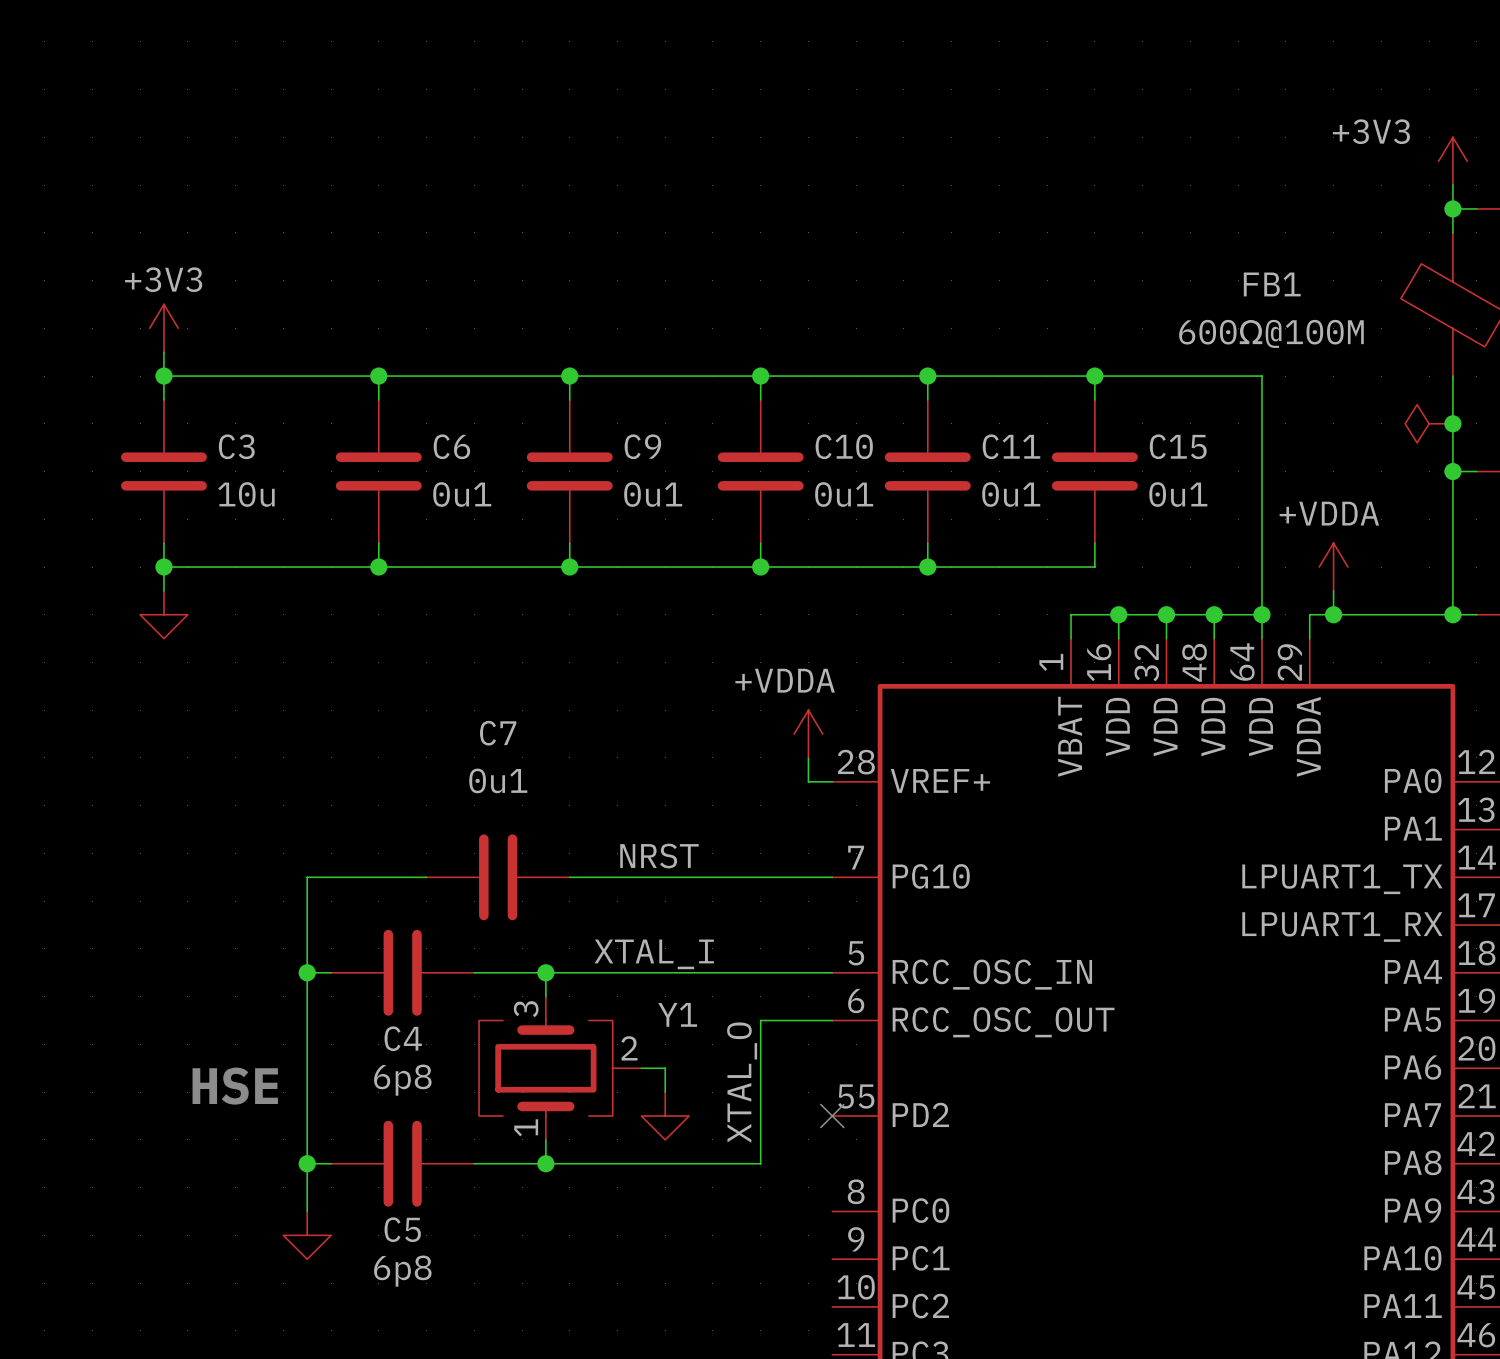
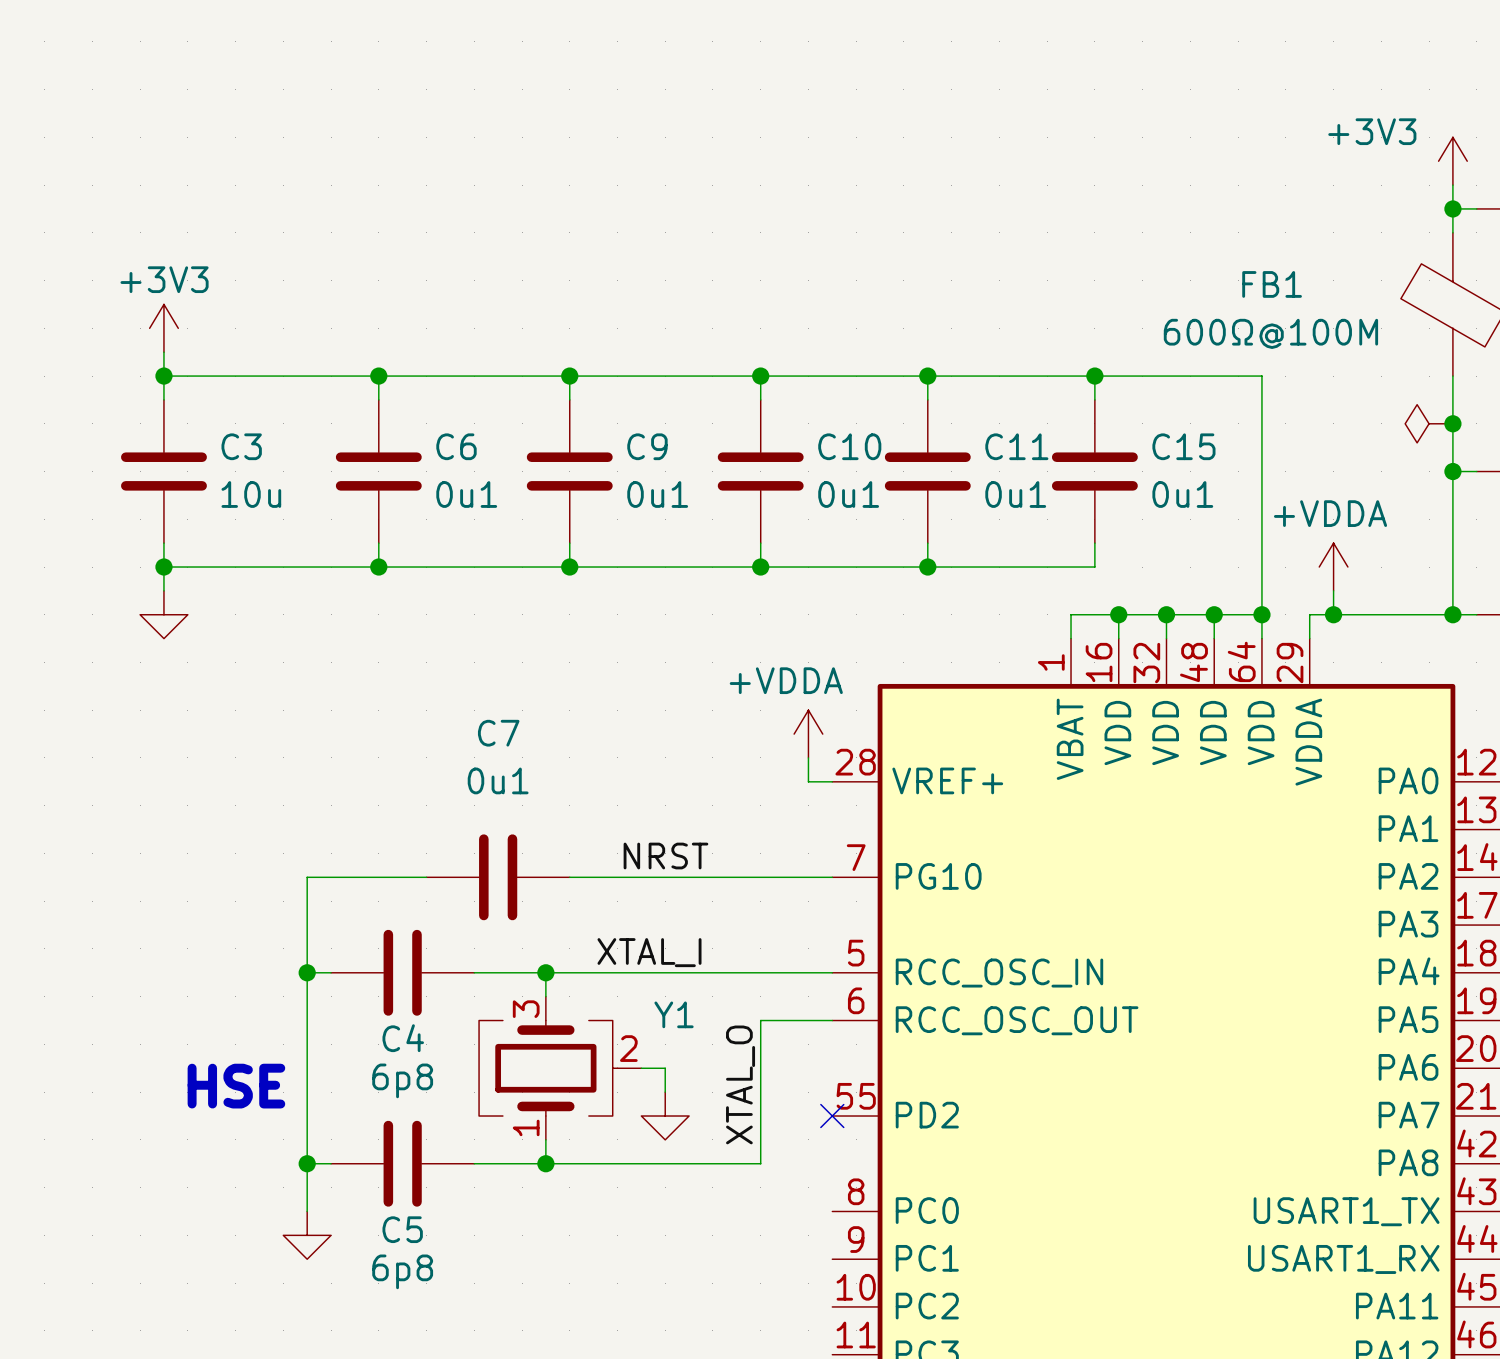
part pin name: LPUART1_TX (1342, 879) -> PA2 (1408, 876)
part pin name: LPUART1_RX (1342, 927) -> PA3 (1408, 924)
part pin name: PA9 (1413, 1210) -> USART1_TX (1346, 1211)
part pin name: PA10 (1402, 1258) -> USART1_RX (1343, 1259)

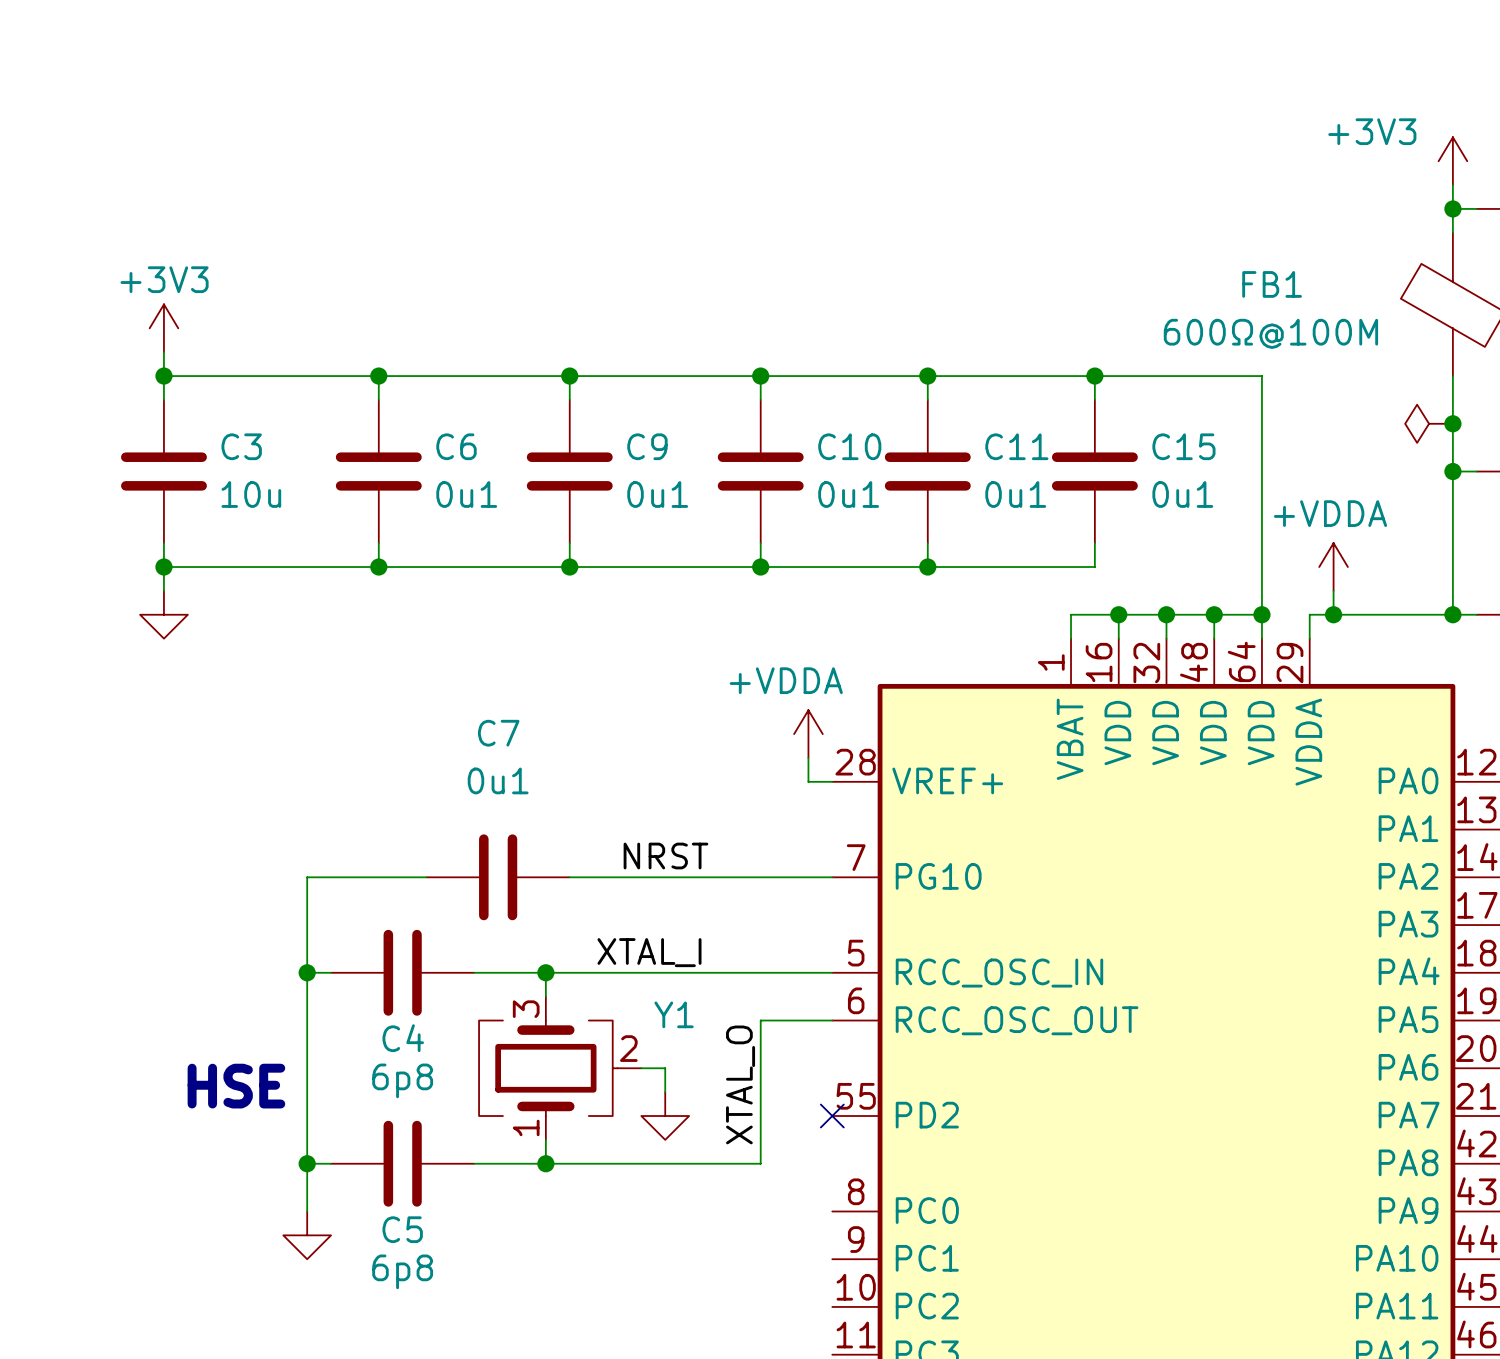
part pin name: USART1_TX (1346, 1211) -> PA9 (1408, 1210)
part pin name: USART1_RX (1343, 1259) -> PA10 (1397, 1258)

